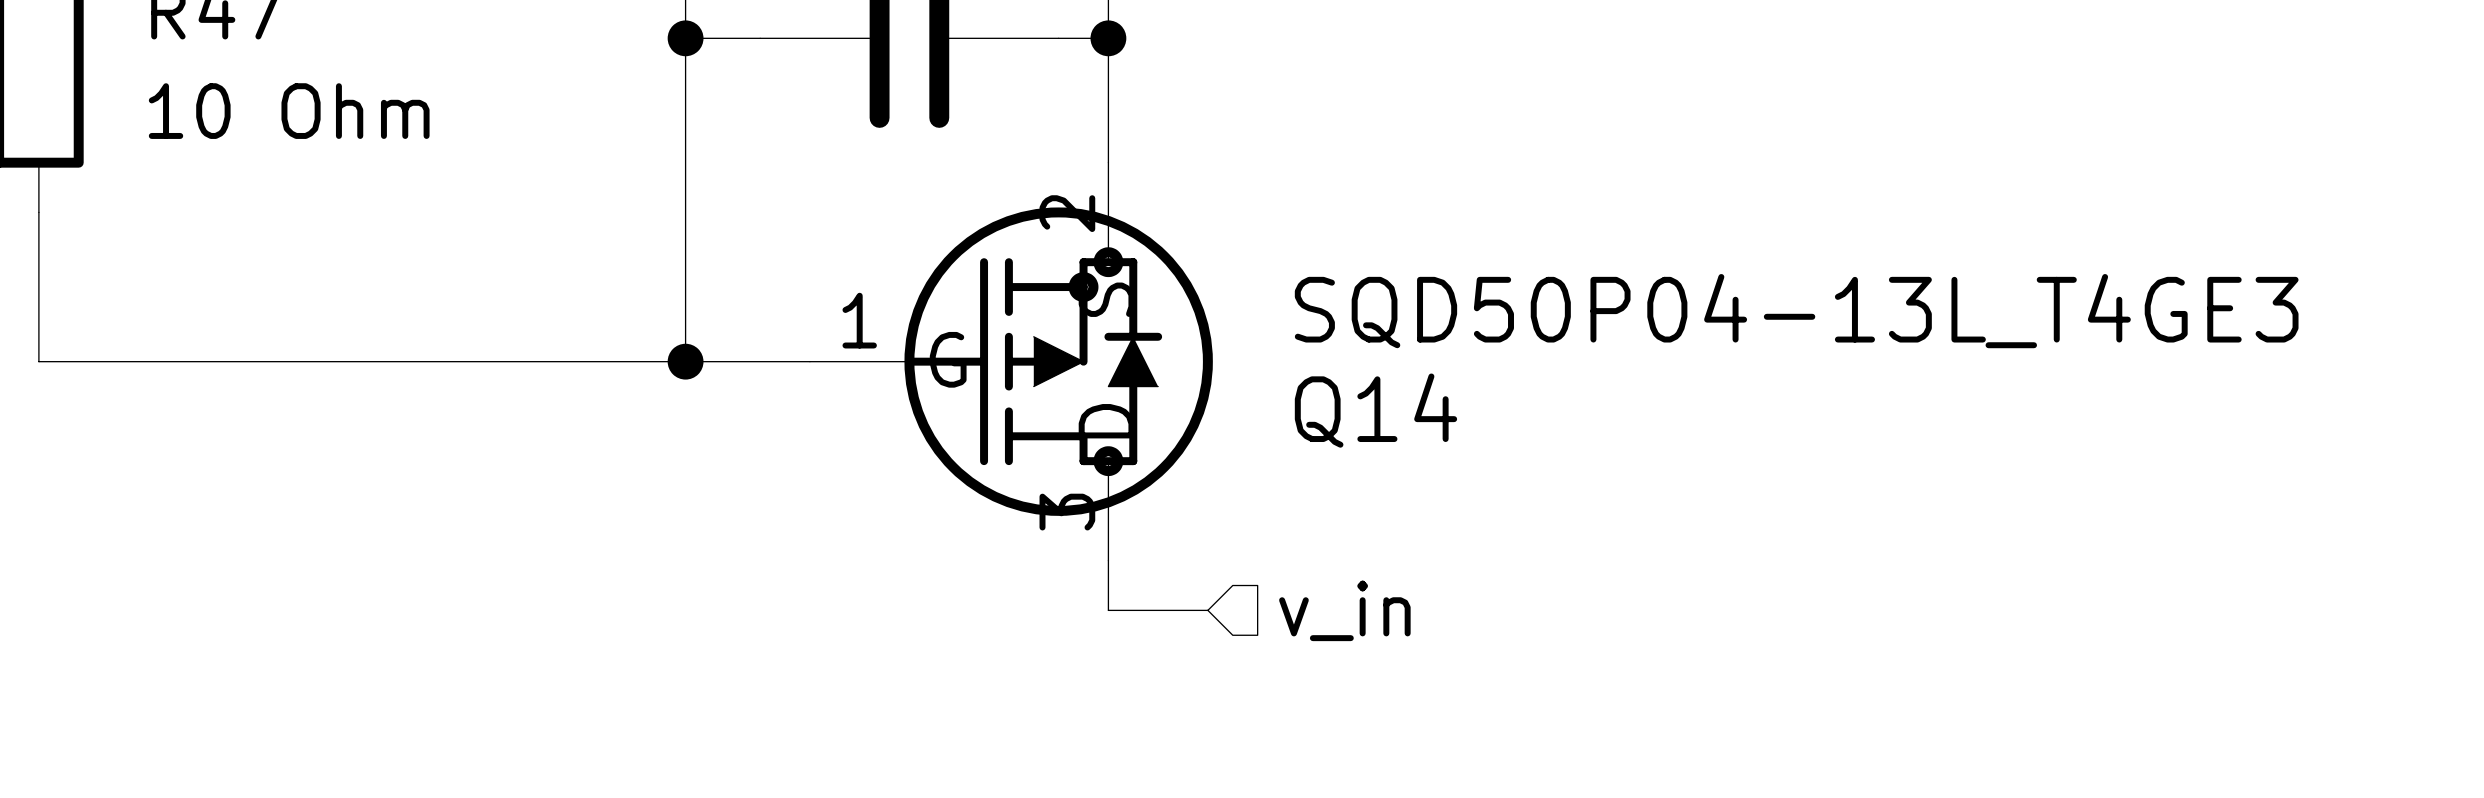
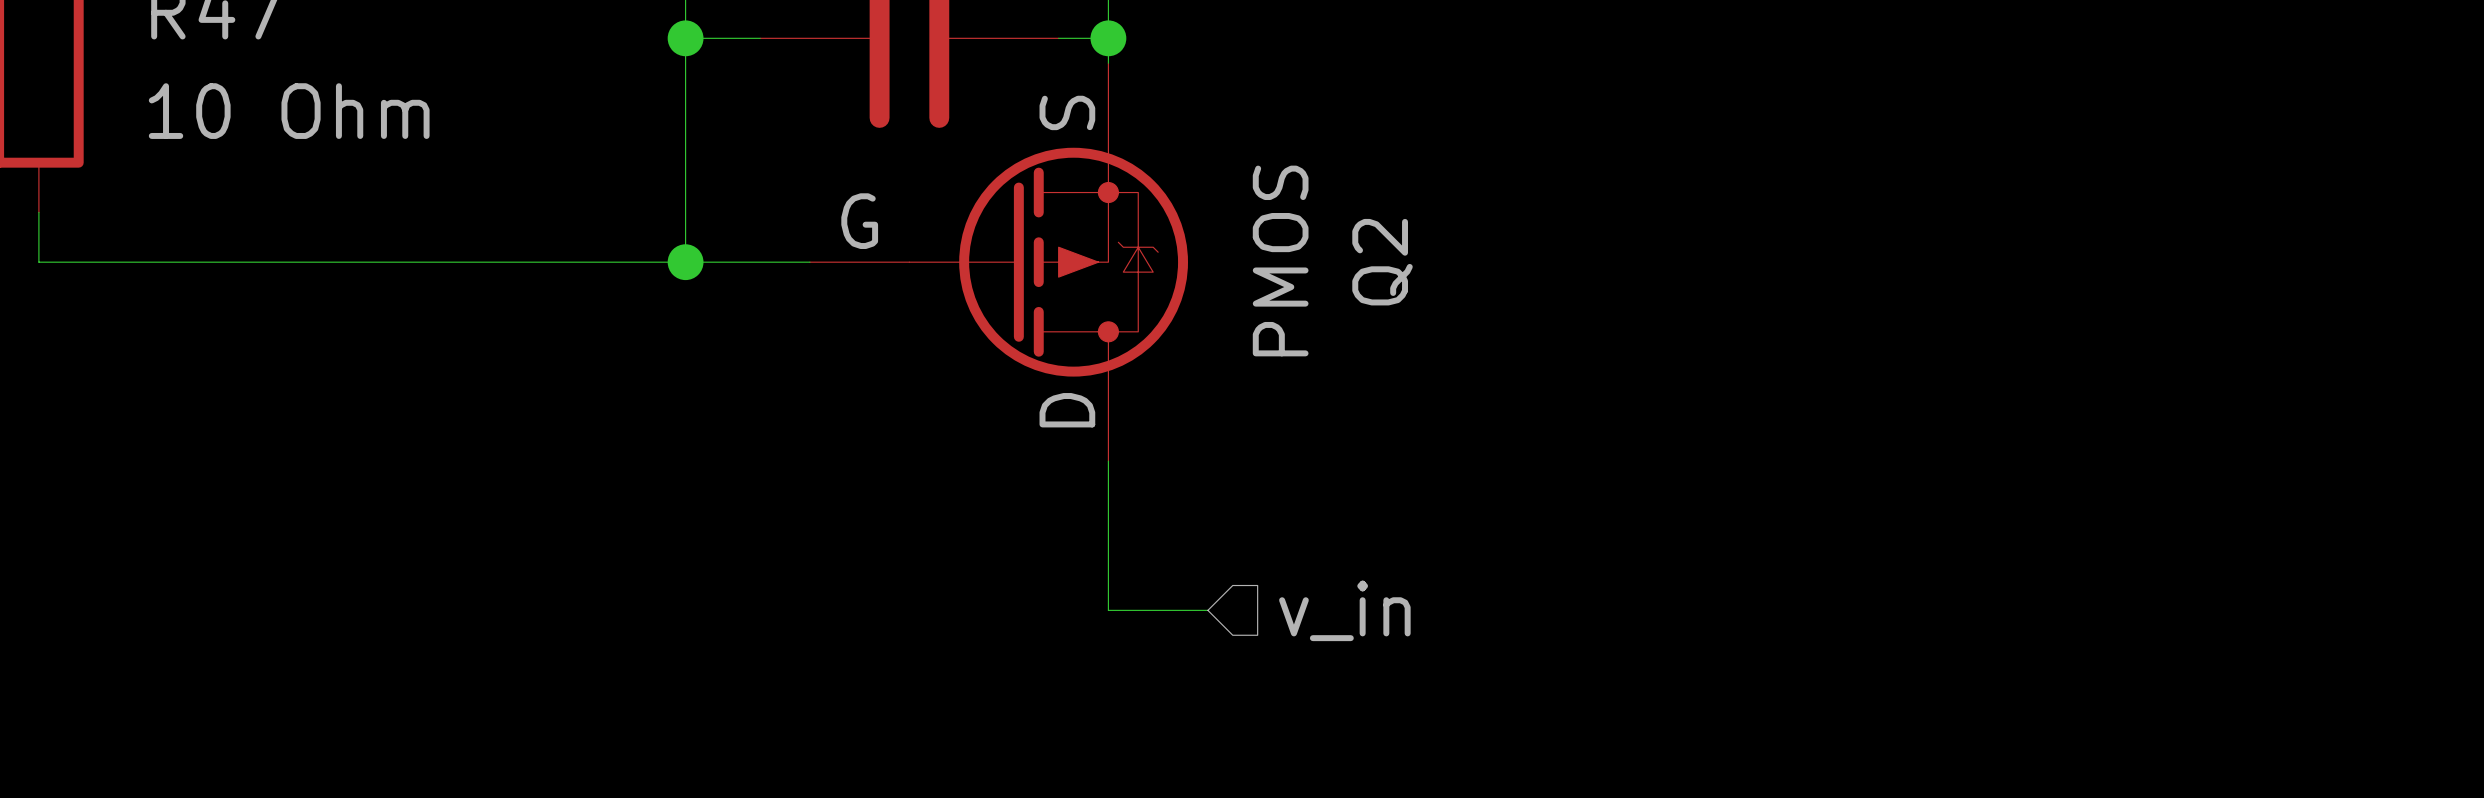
wire: (38, 262) (38, 361) (809, 361) -> (38, 262) (809, 262)
wire: (685, 262) (685, 361) -> none
Q2: none -> PMOS (998, 262)
junction position: (685, 361) -> (685, 262)
Q14: SQD50P04-13L_T4GE3 (1011, 361) -> none

